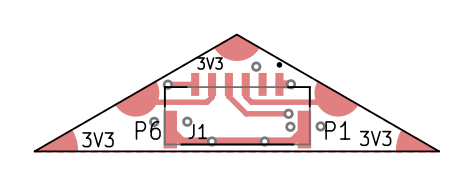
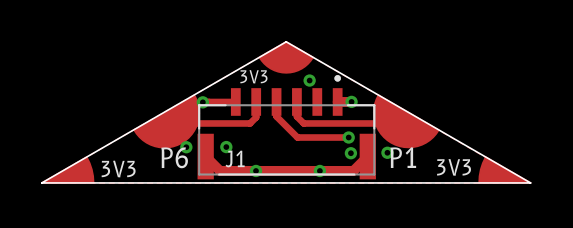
part footprint: [33, 33, 440, 153] -> [41, 41, 532, 184]

